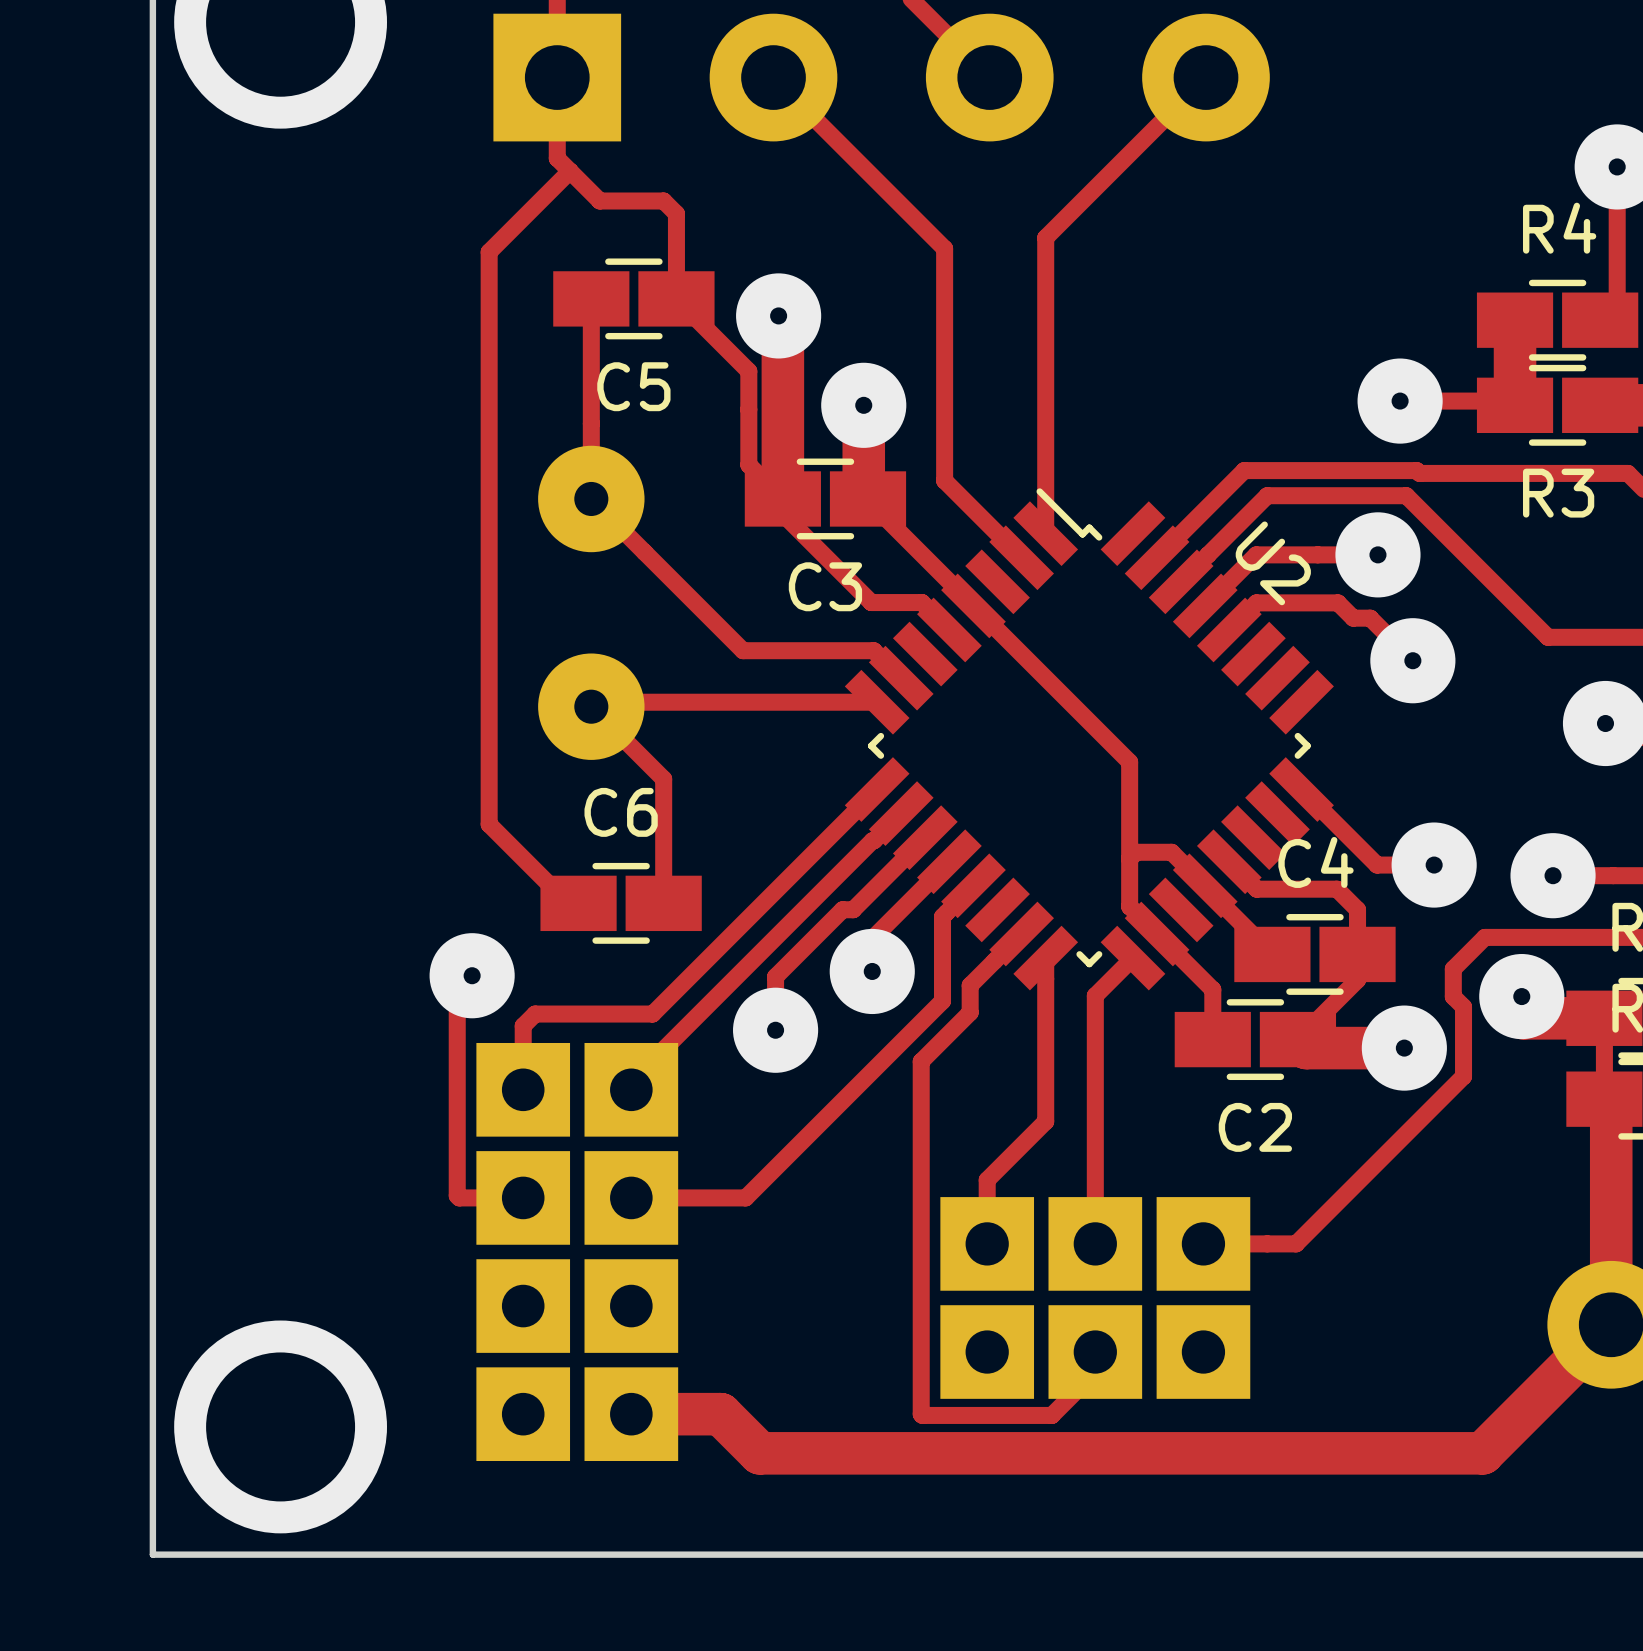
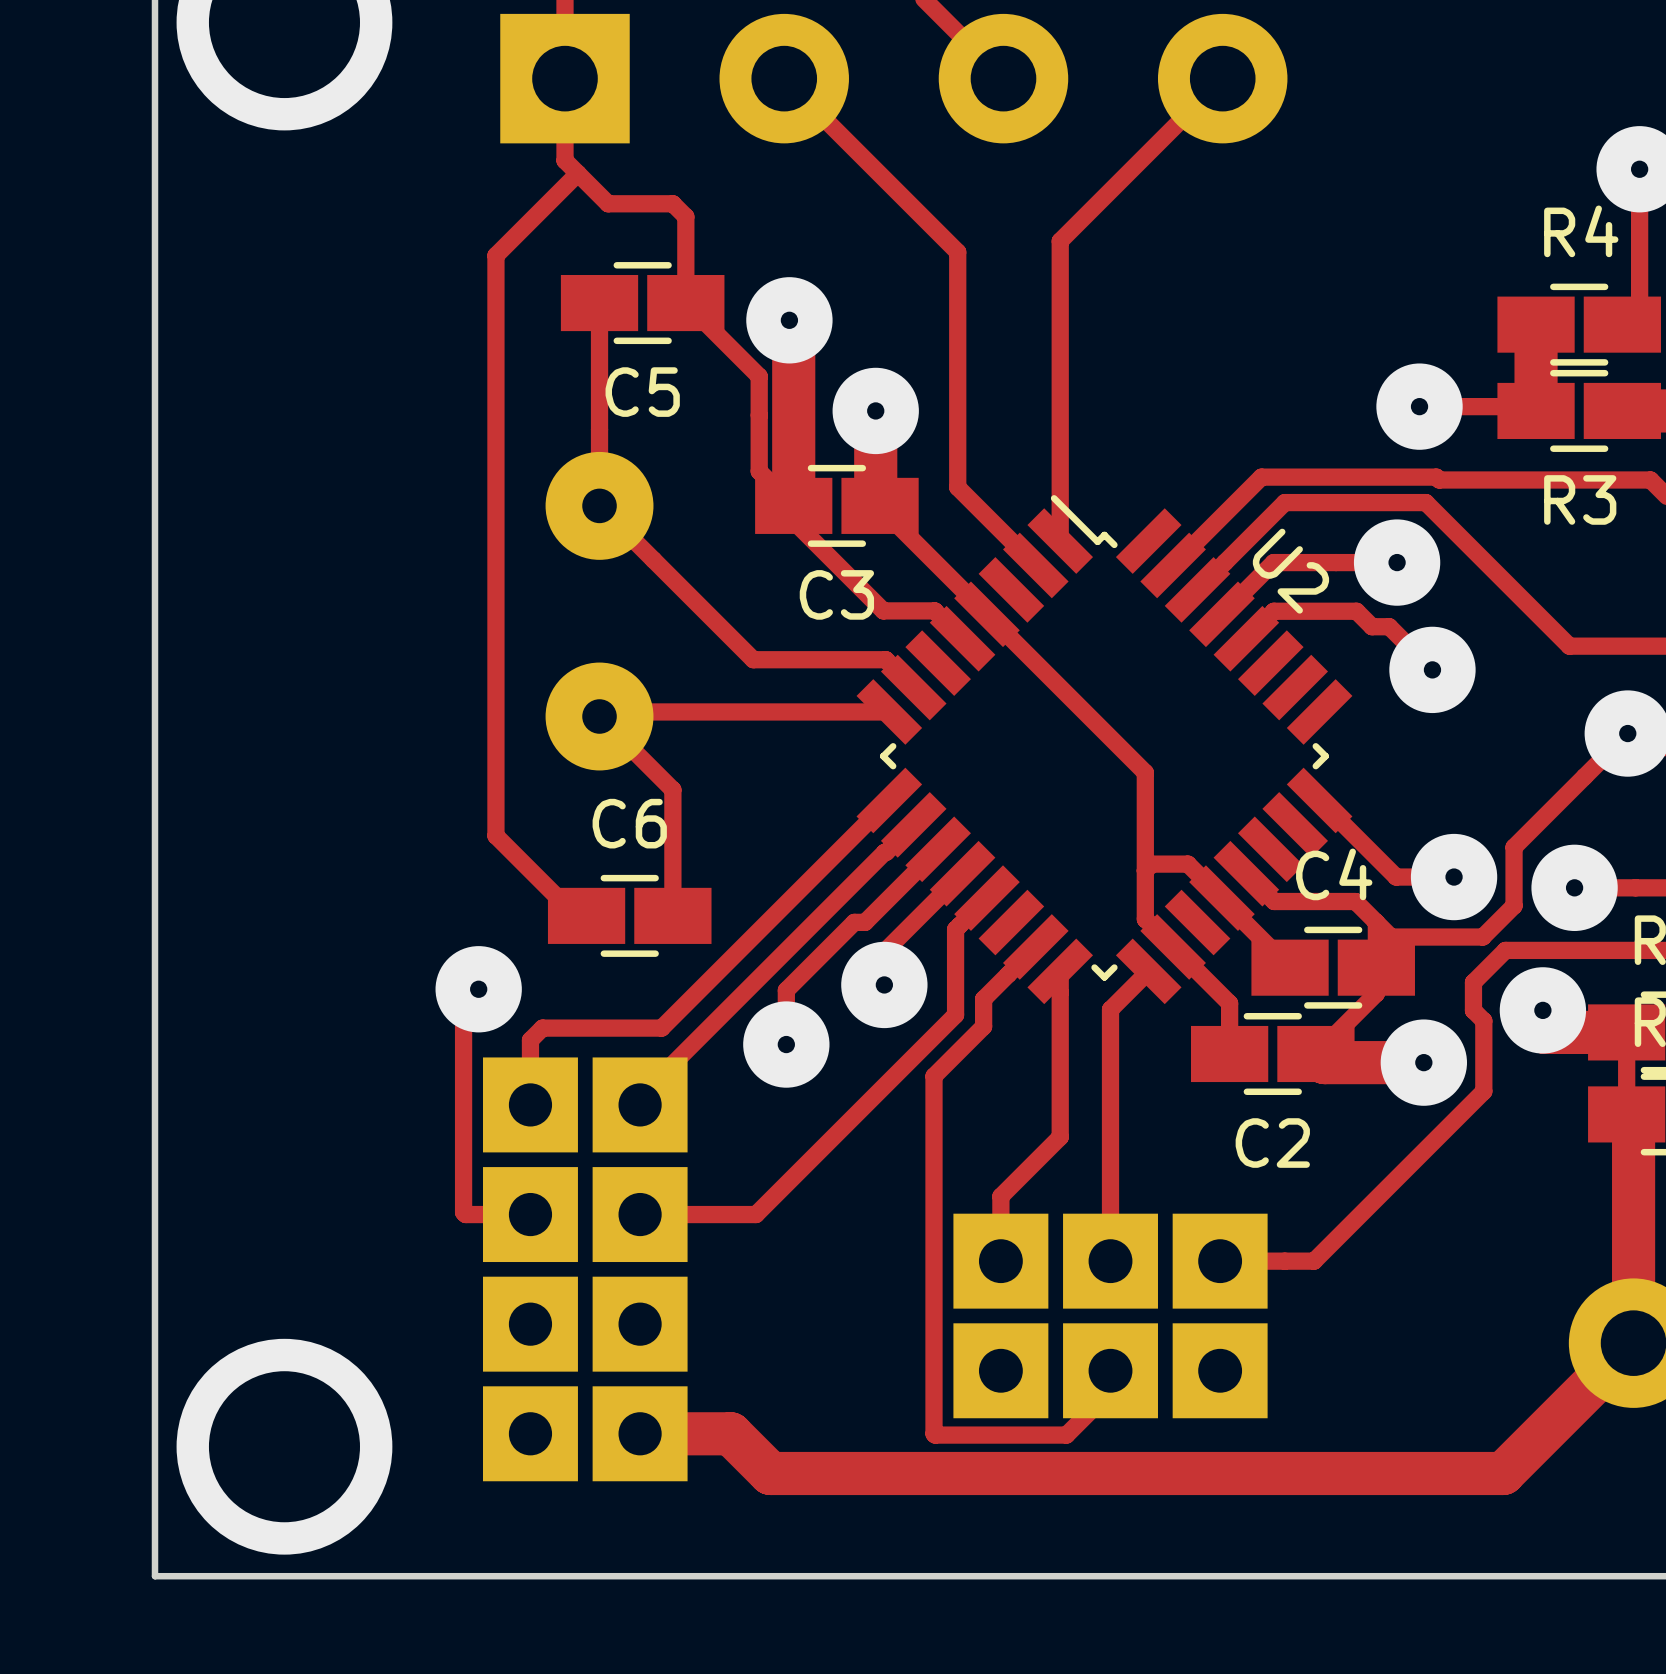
track: none -> (1627, 733) (1514, 847) (1514, 905) (1482, 937) (1391, 937) (1376, 922)

